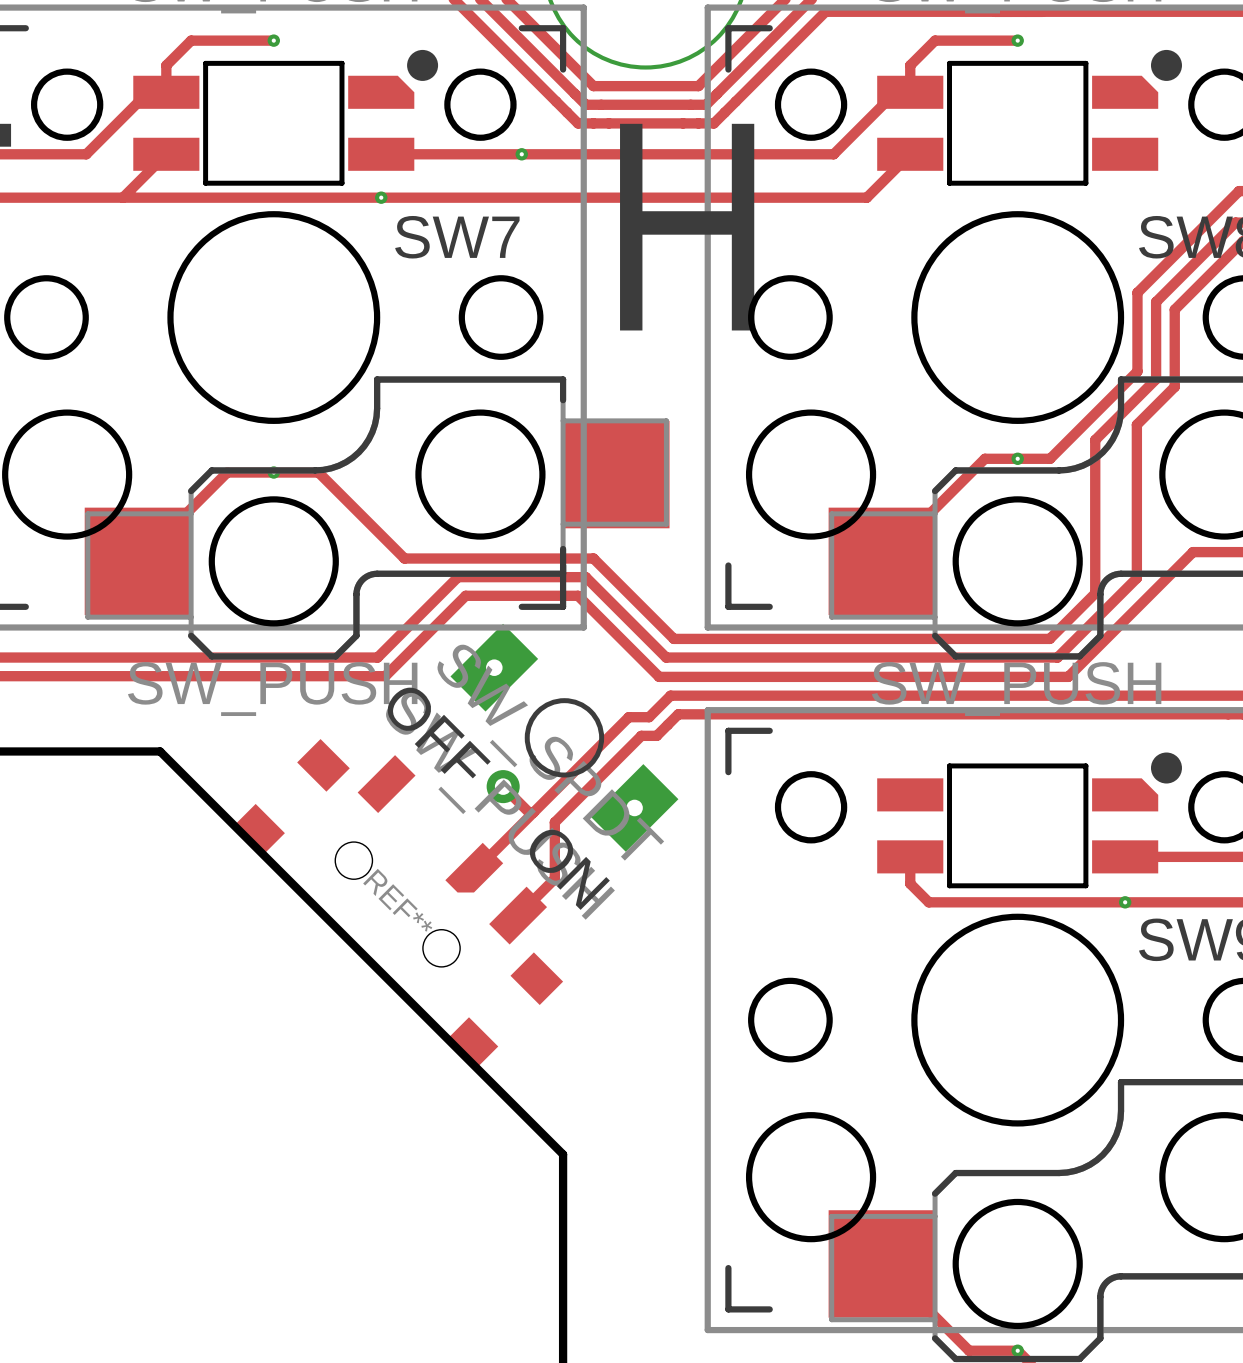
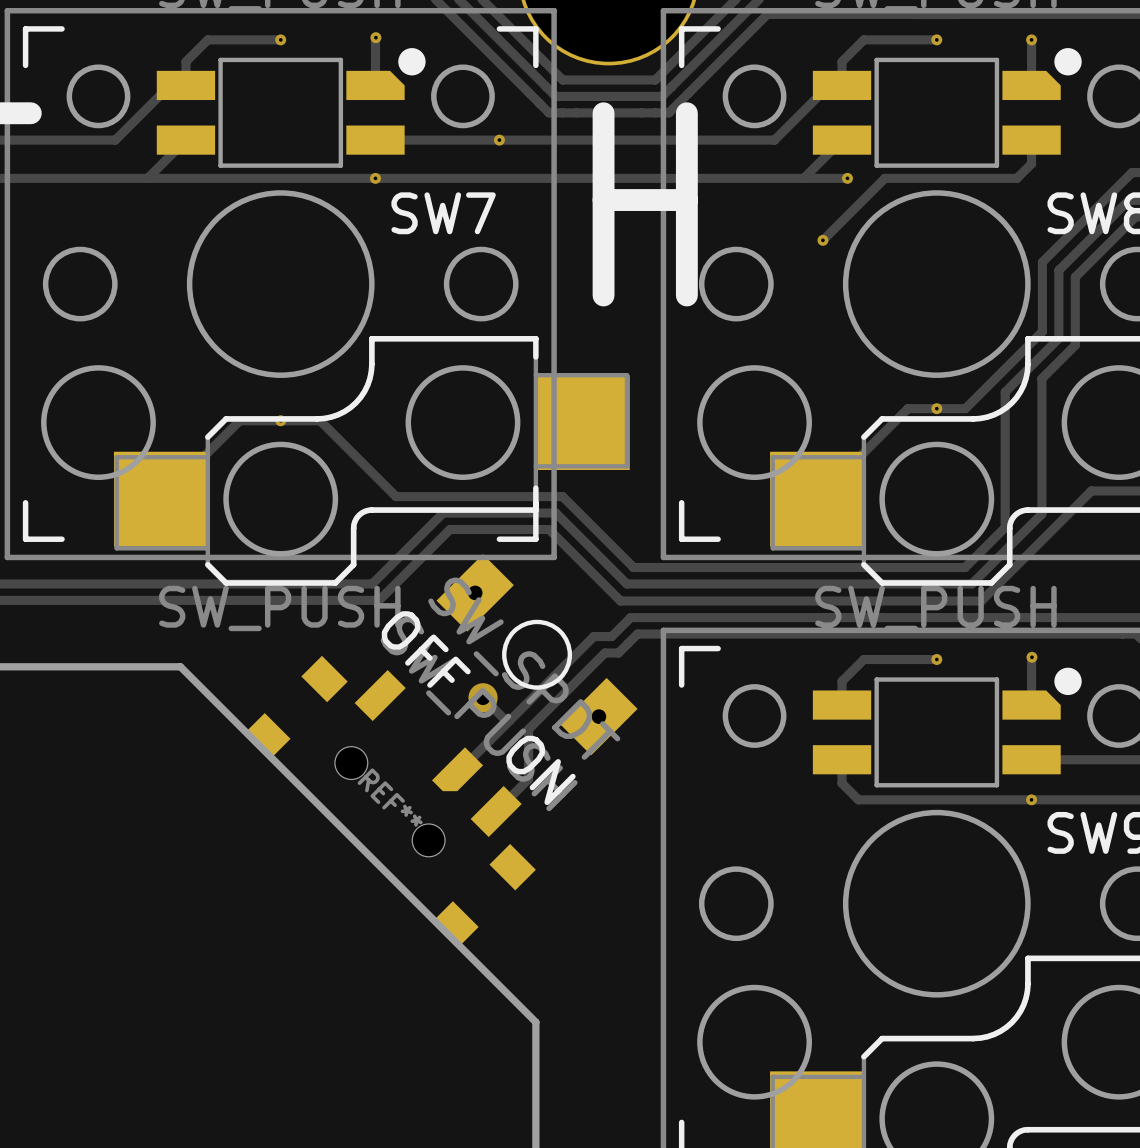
track: none -> (375, 38) (375, 85)
via: none -> (375, 37)
track: none -> (1031, 39) (1031, 85)
via: none -> (1031, 39)
track: none -> (1031, 140) (1031, 163) (1016, 178) (884, 178) (822, 240)
track: none -> (803, 178) (847, 178)
via: none -> (847, 178)
via: none -> (822, 240)
via: none -> (1031, 657)
track: none -> (1031, 657) (1031, 705)
track: none -> (936, 659) (863, 659) (842, 681) (842, 705)
via: none -> (936, 659)

